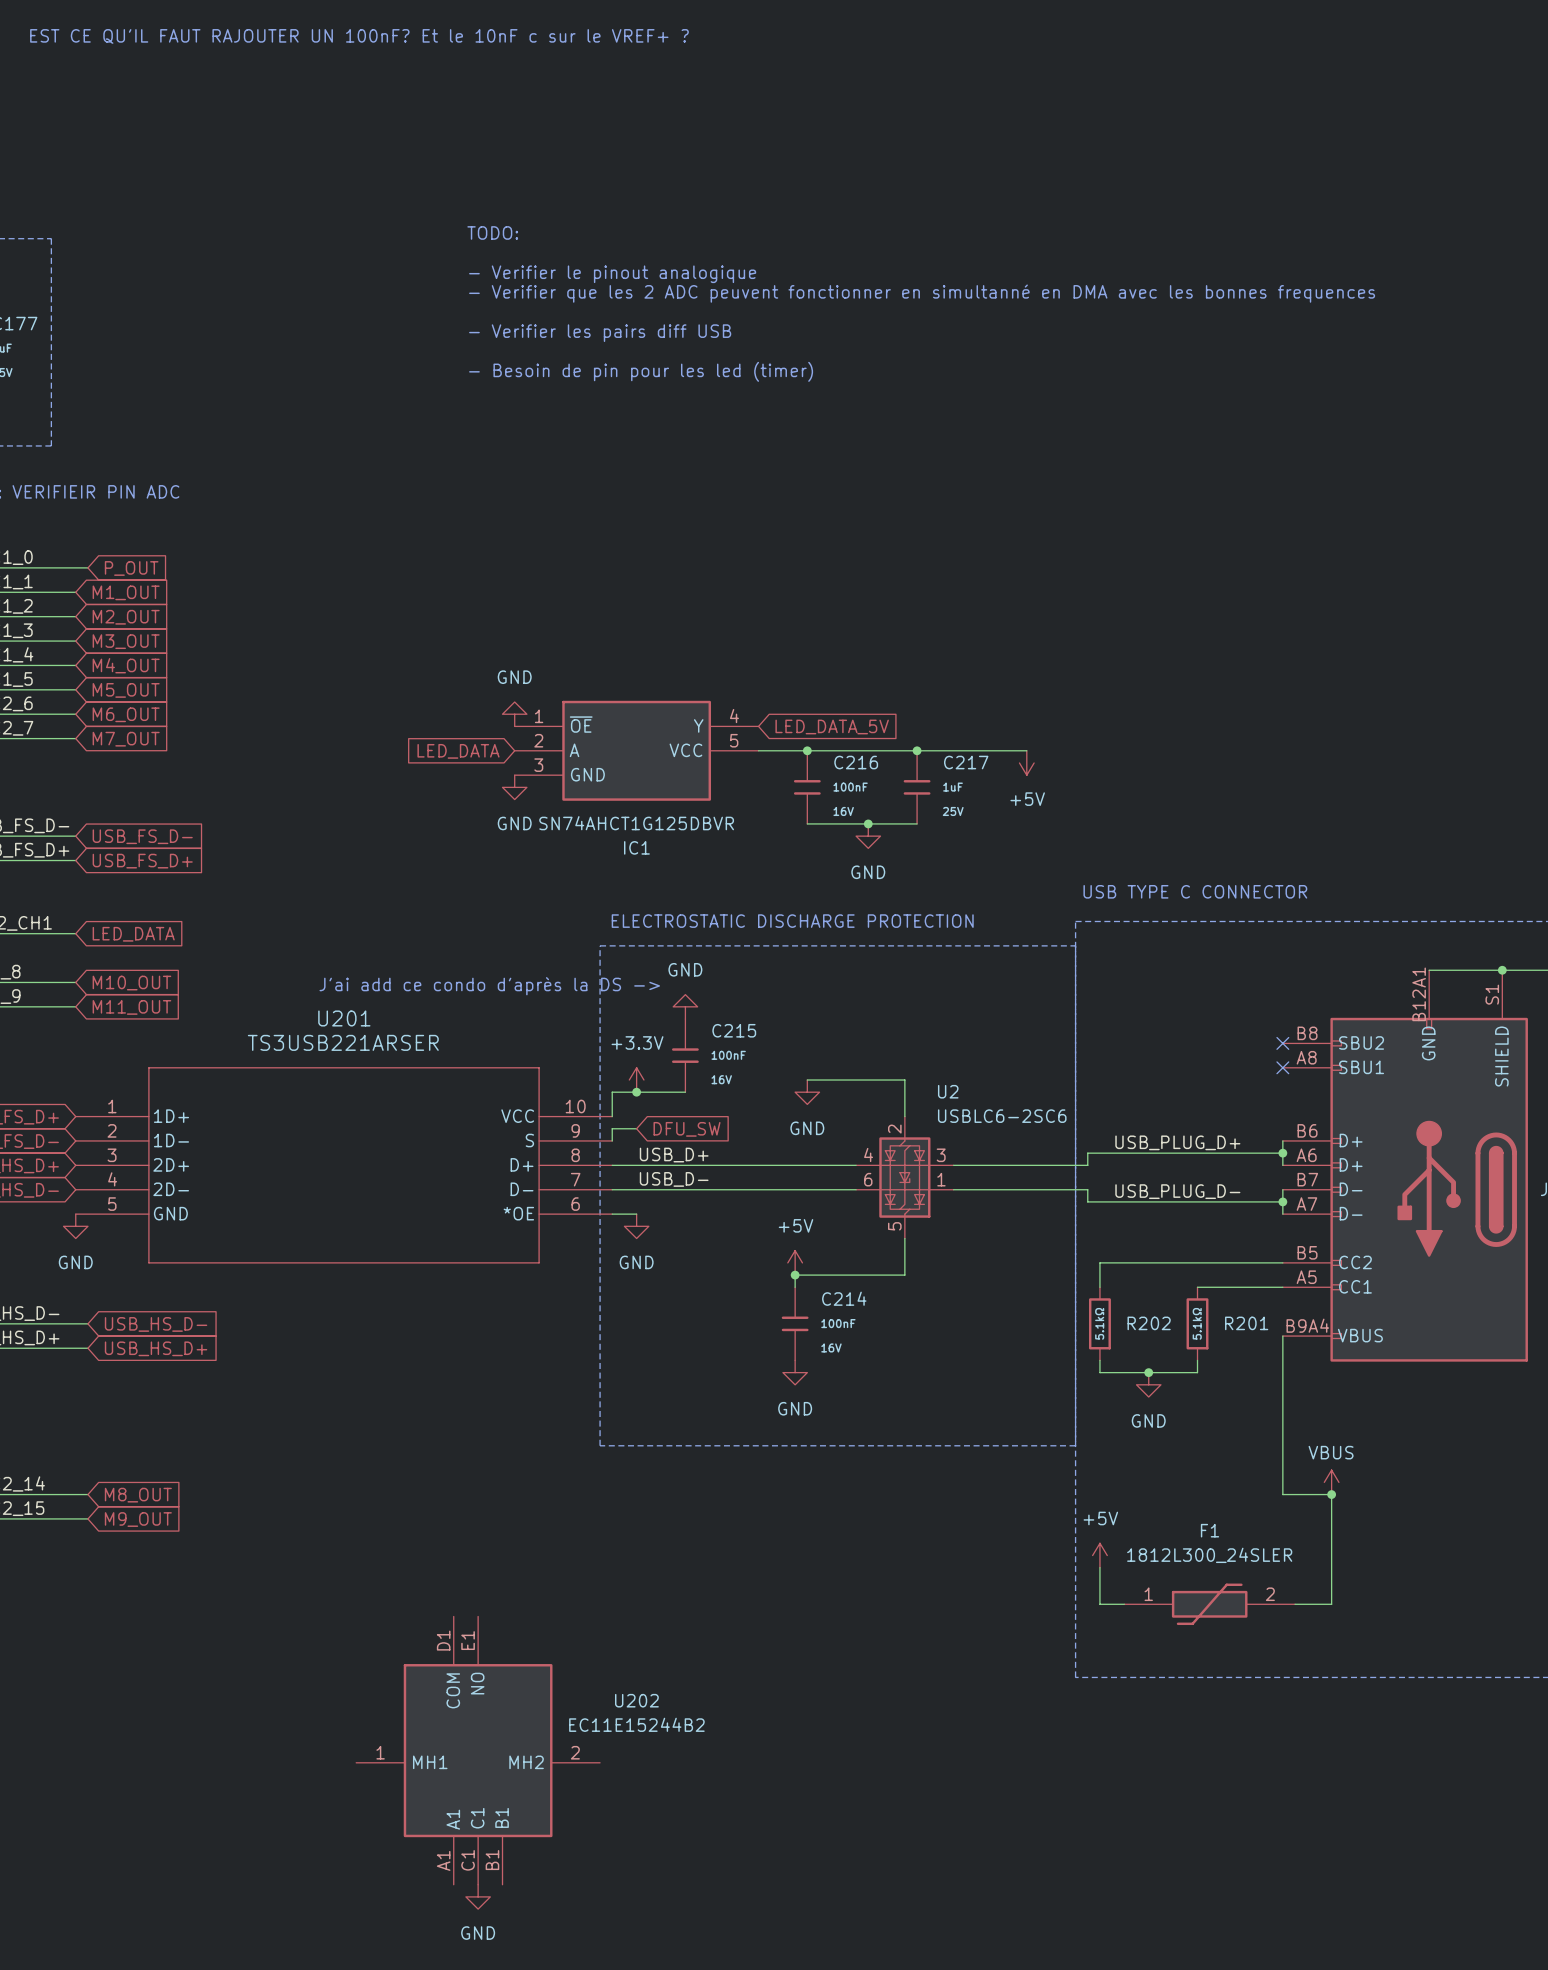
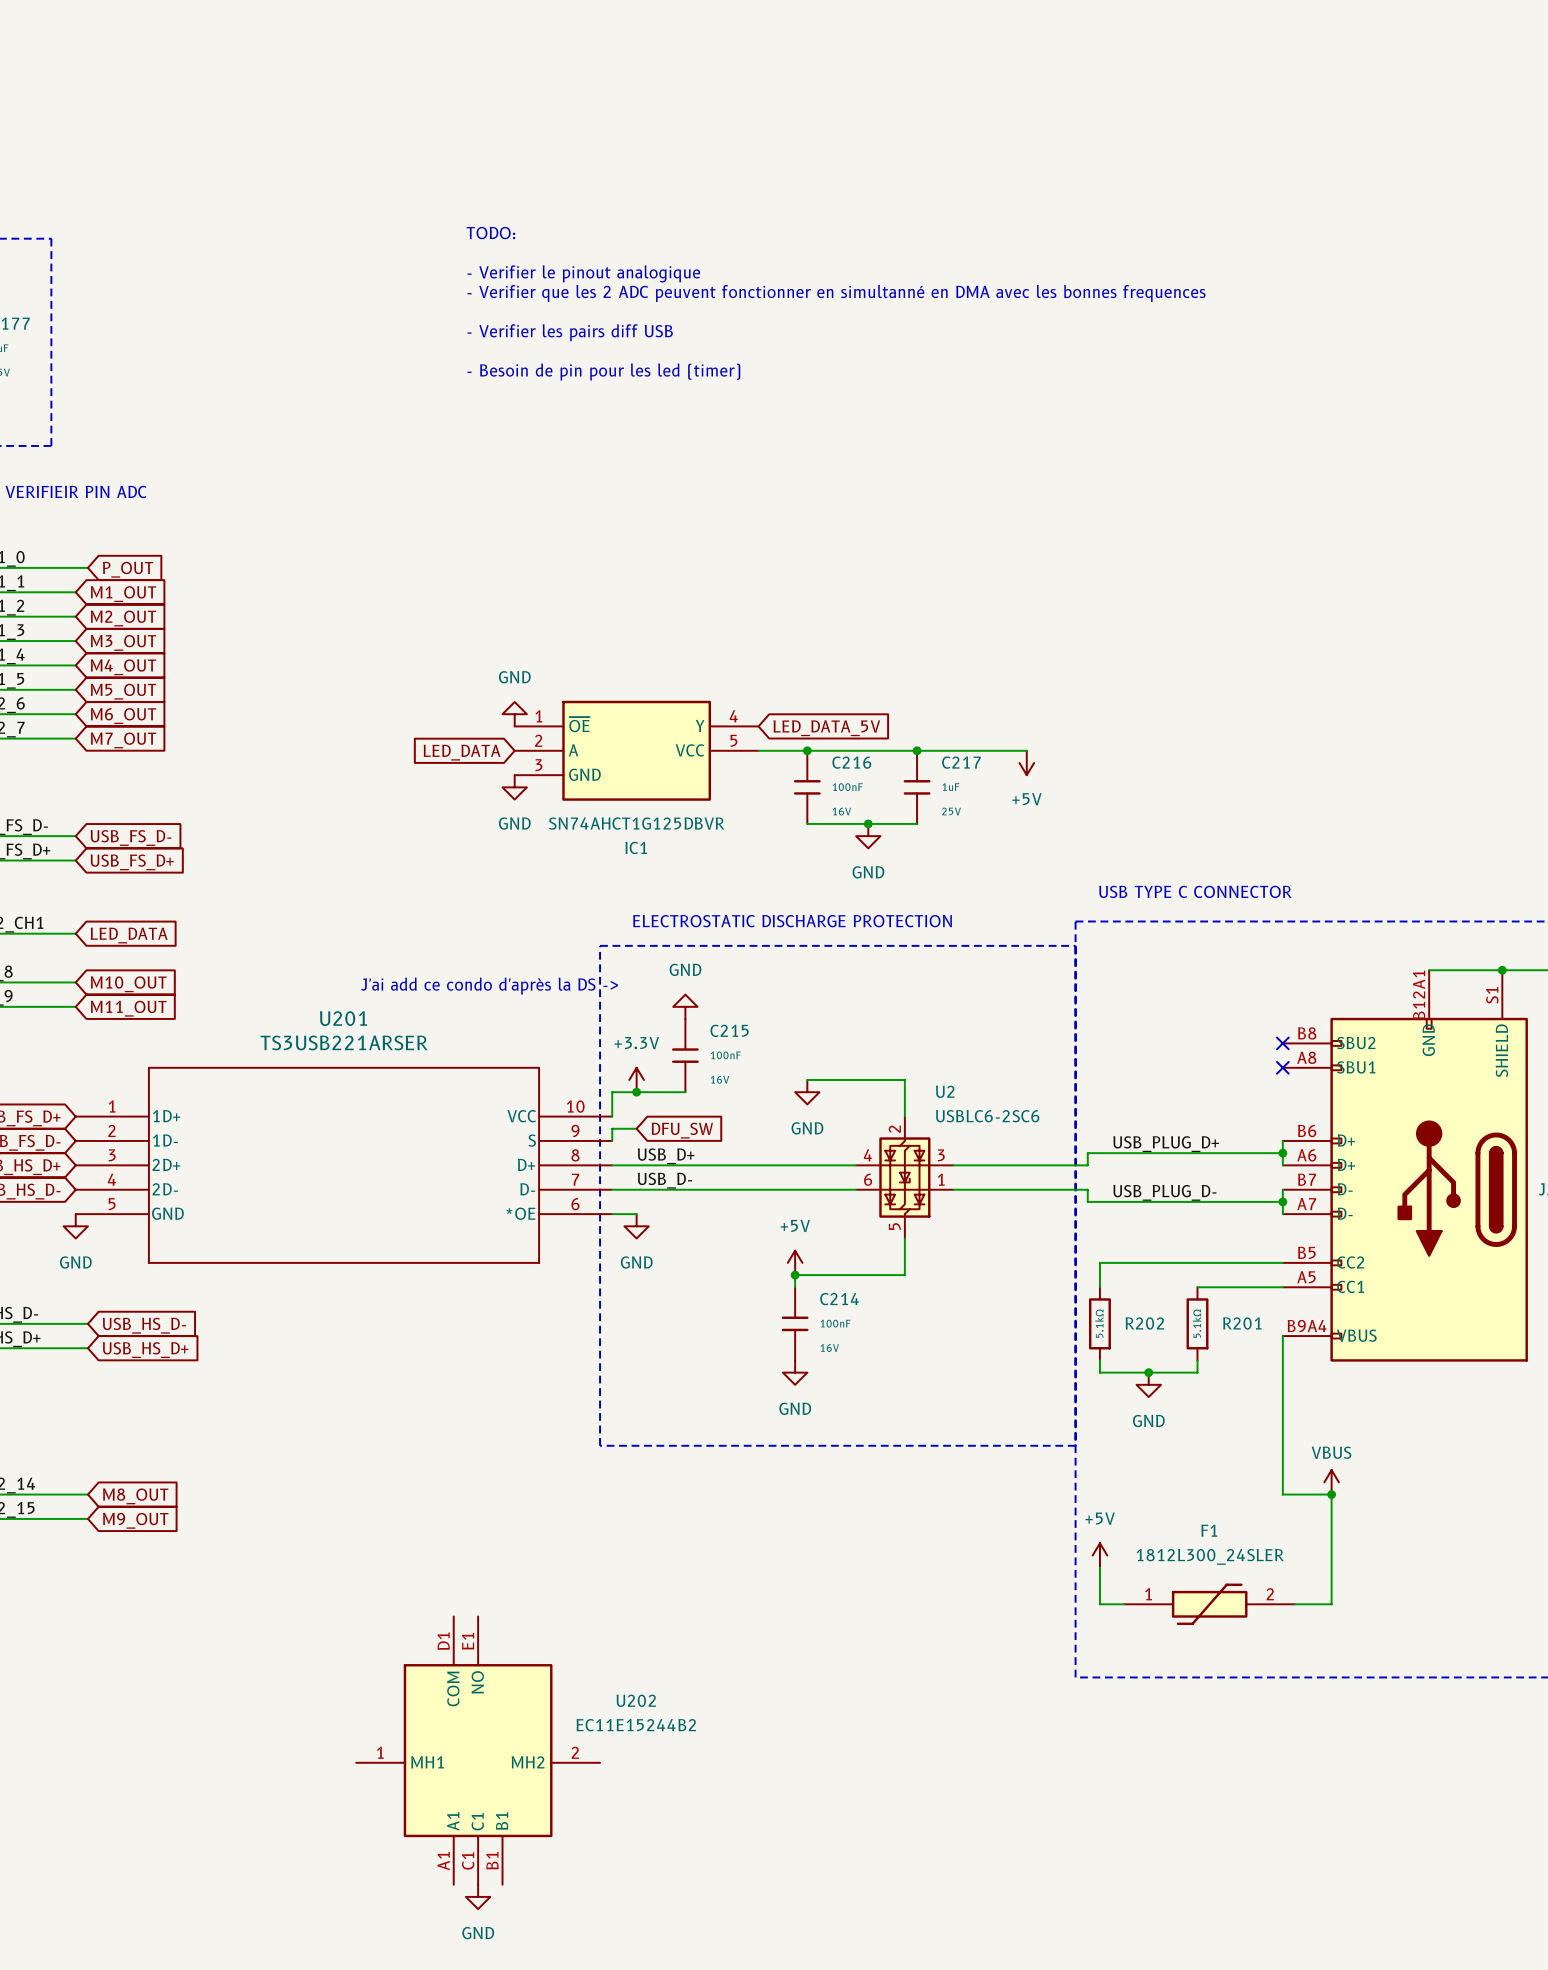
text: EST CE QU'IL FAUT RAJOUTER UN 100nF? Et le 10nF c sur le VREF+ ? (359, 36) -> none

